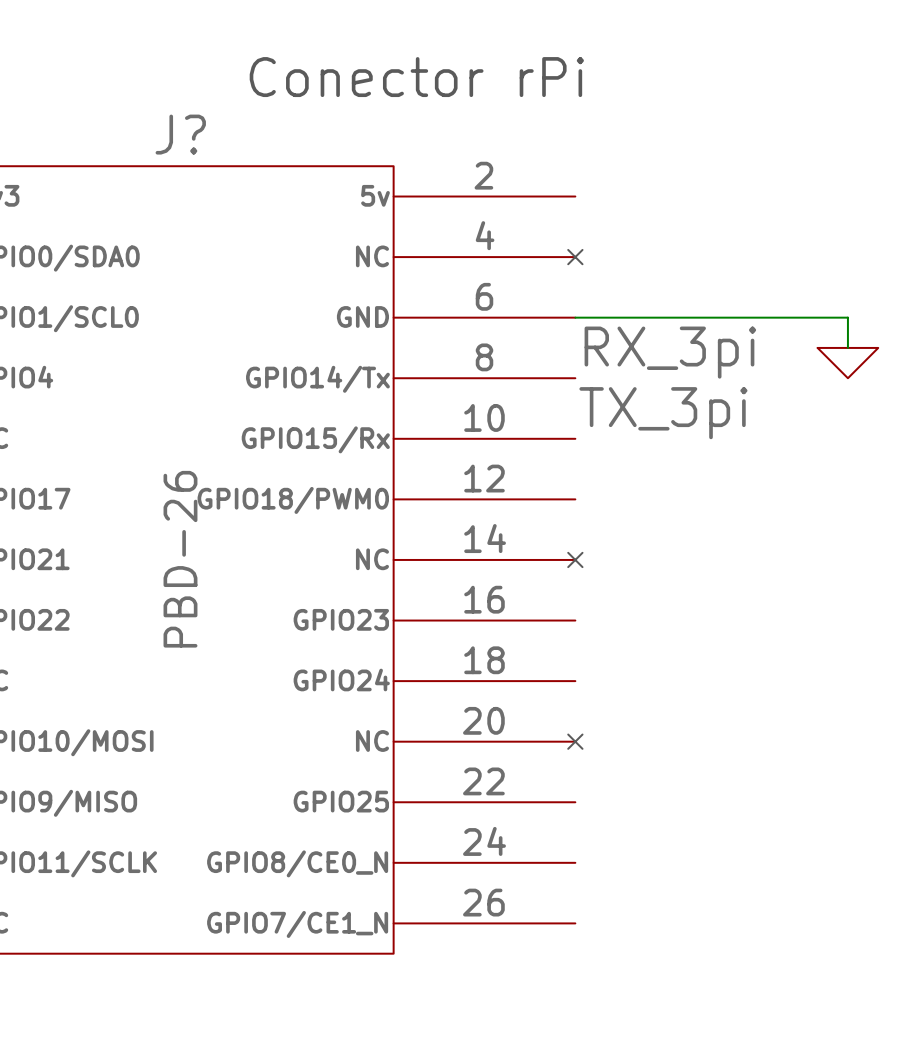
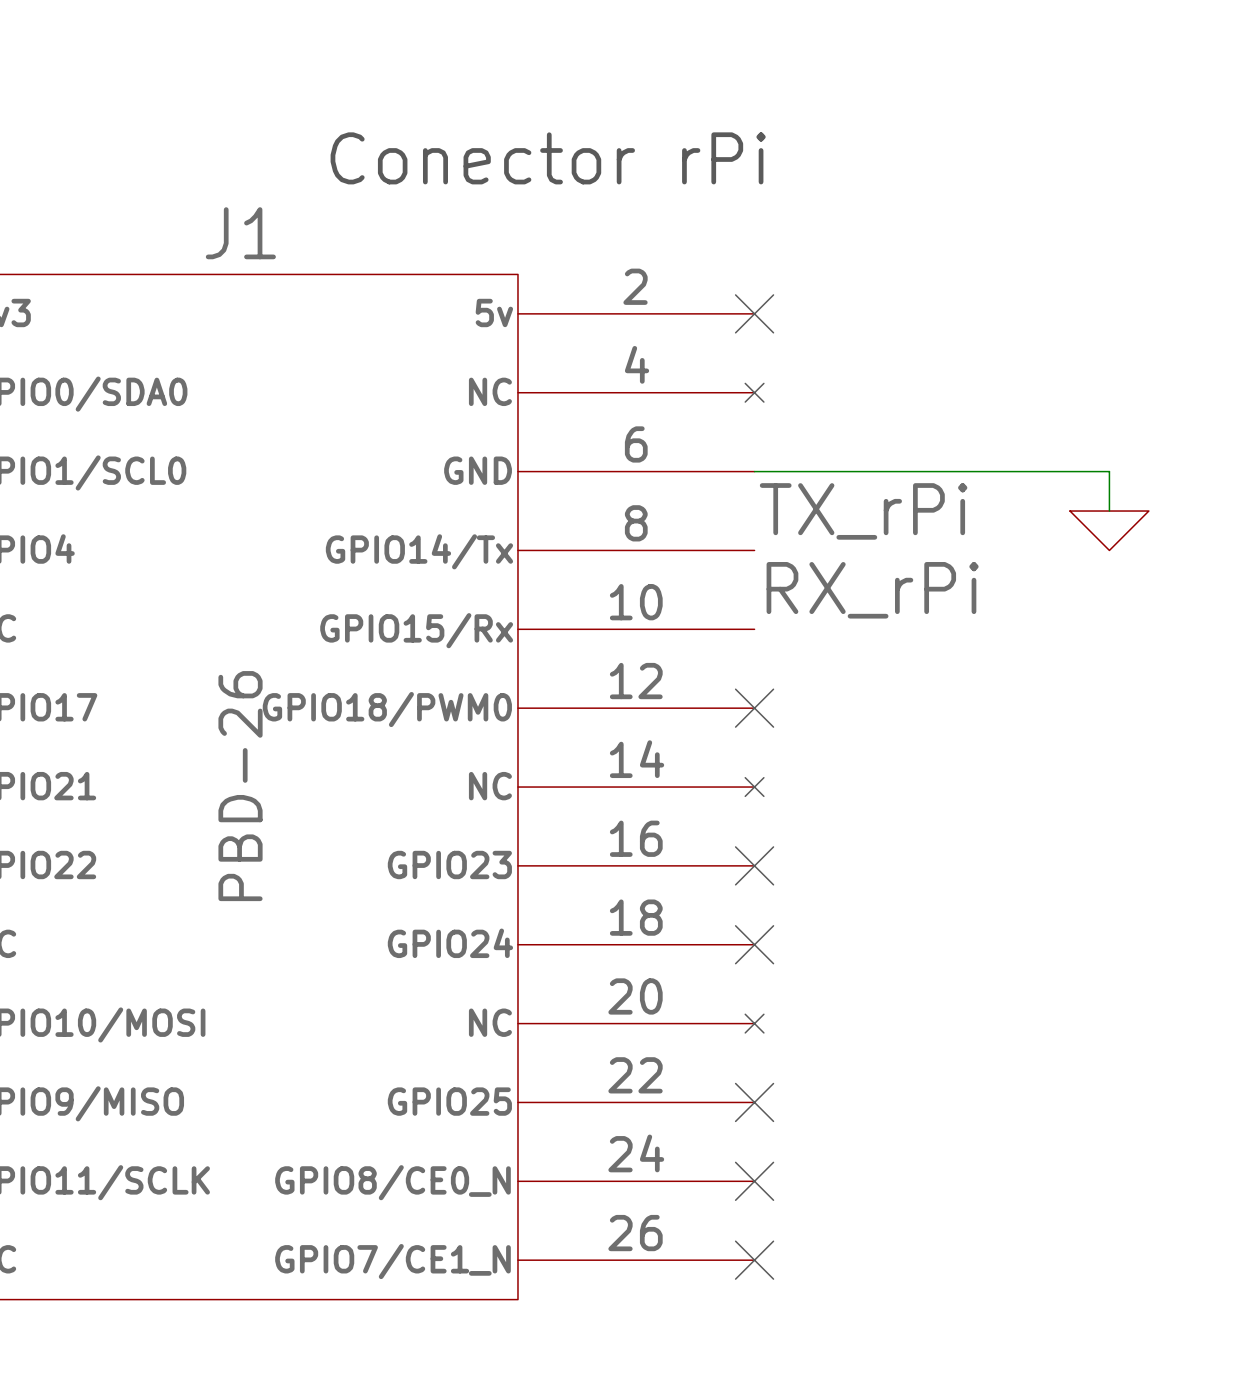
J? name: J? (180, 134) -> J1 (240, 233)
no-connect mark: none -> (754, 313)
label: RX_3pi (670, 352) -> TX_rPi (863, 511)
label: TX_3pi (663, 413) -> RX_rPi (872, 590)
no-connect mark: none -> (754, 708)
no-connect mark: none -> (754, 865)
no-connect mark: none -> (754, 944)
no-connect mark: none -> (754, 1102)
no-connect mark: none -> (754, 1181)
no-connect mark: none -> (754, 1260)

